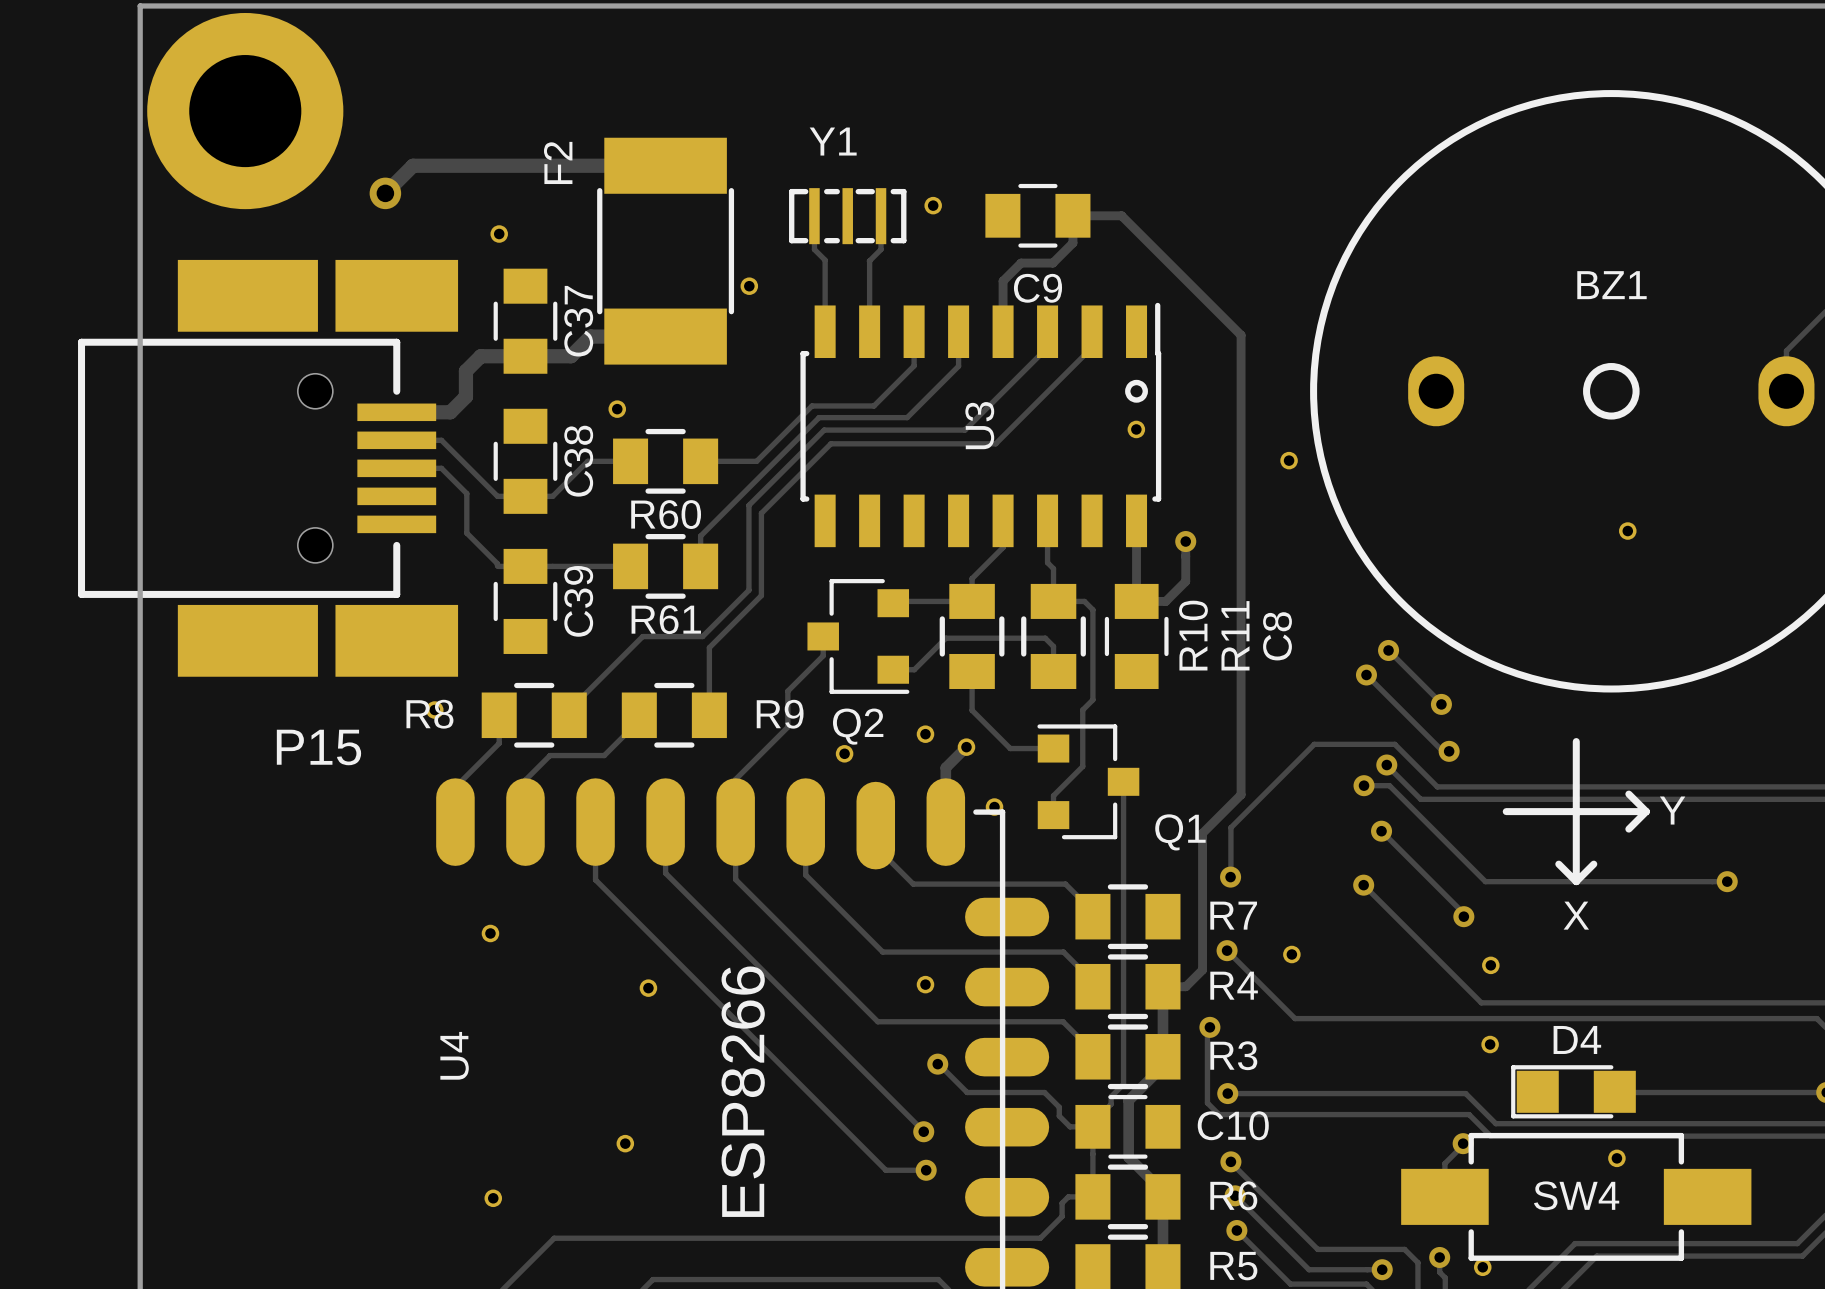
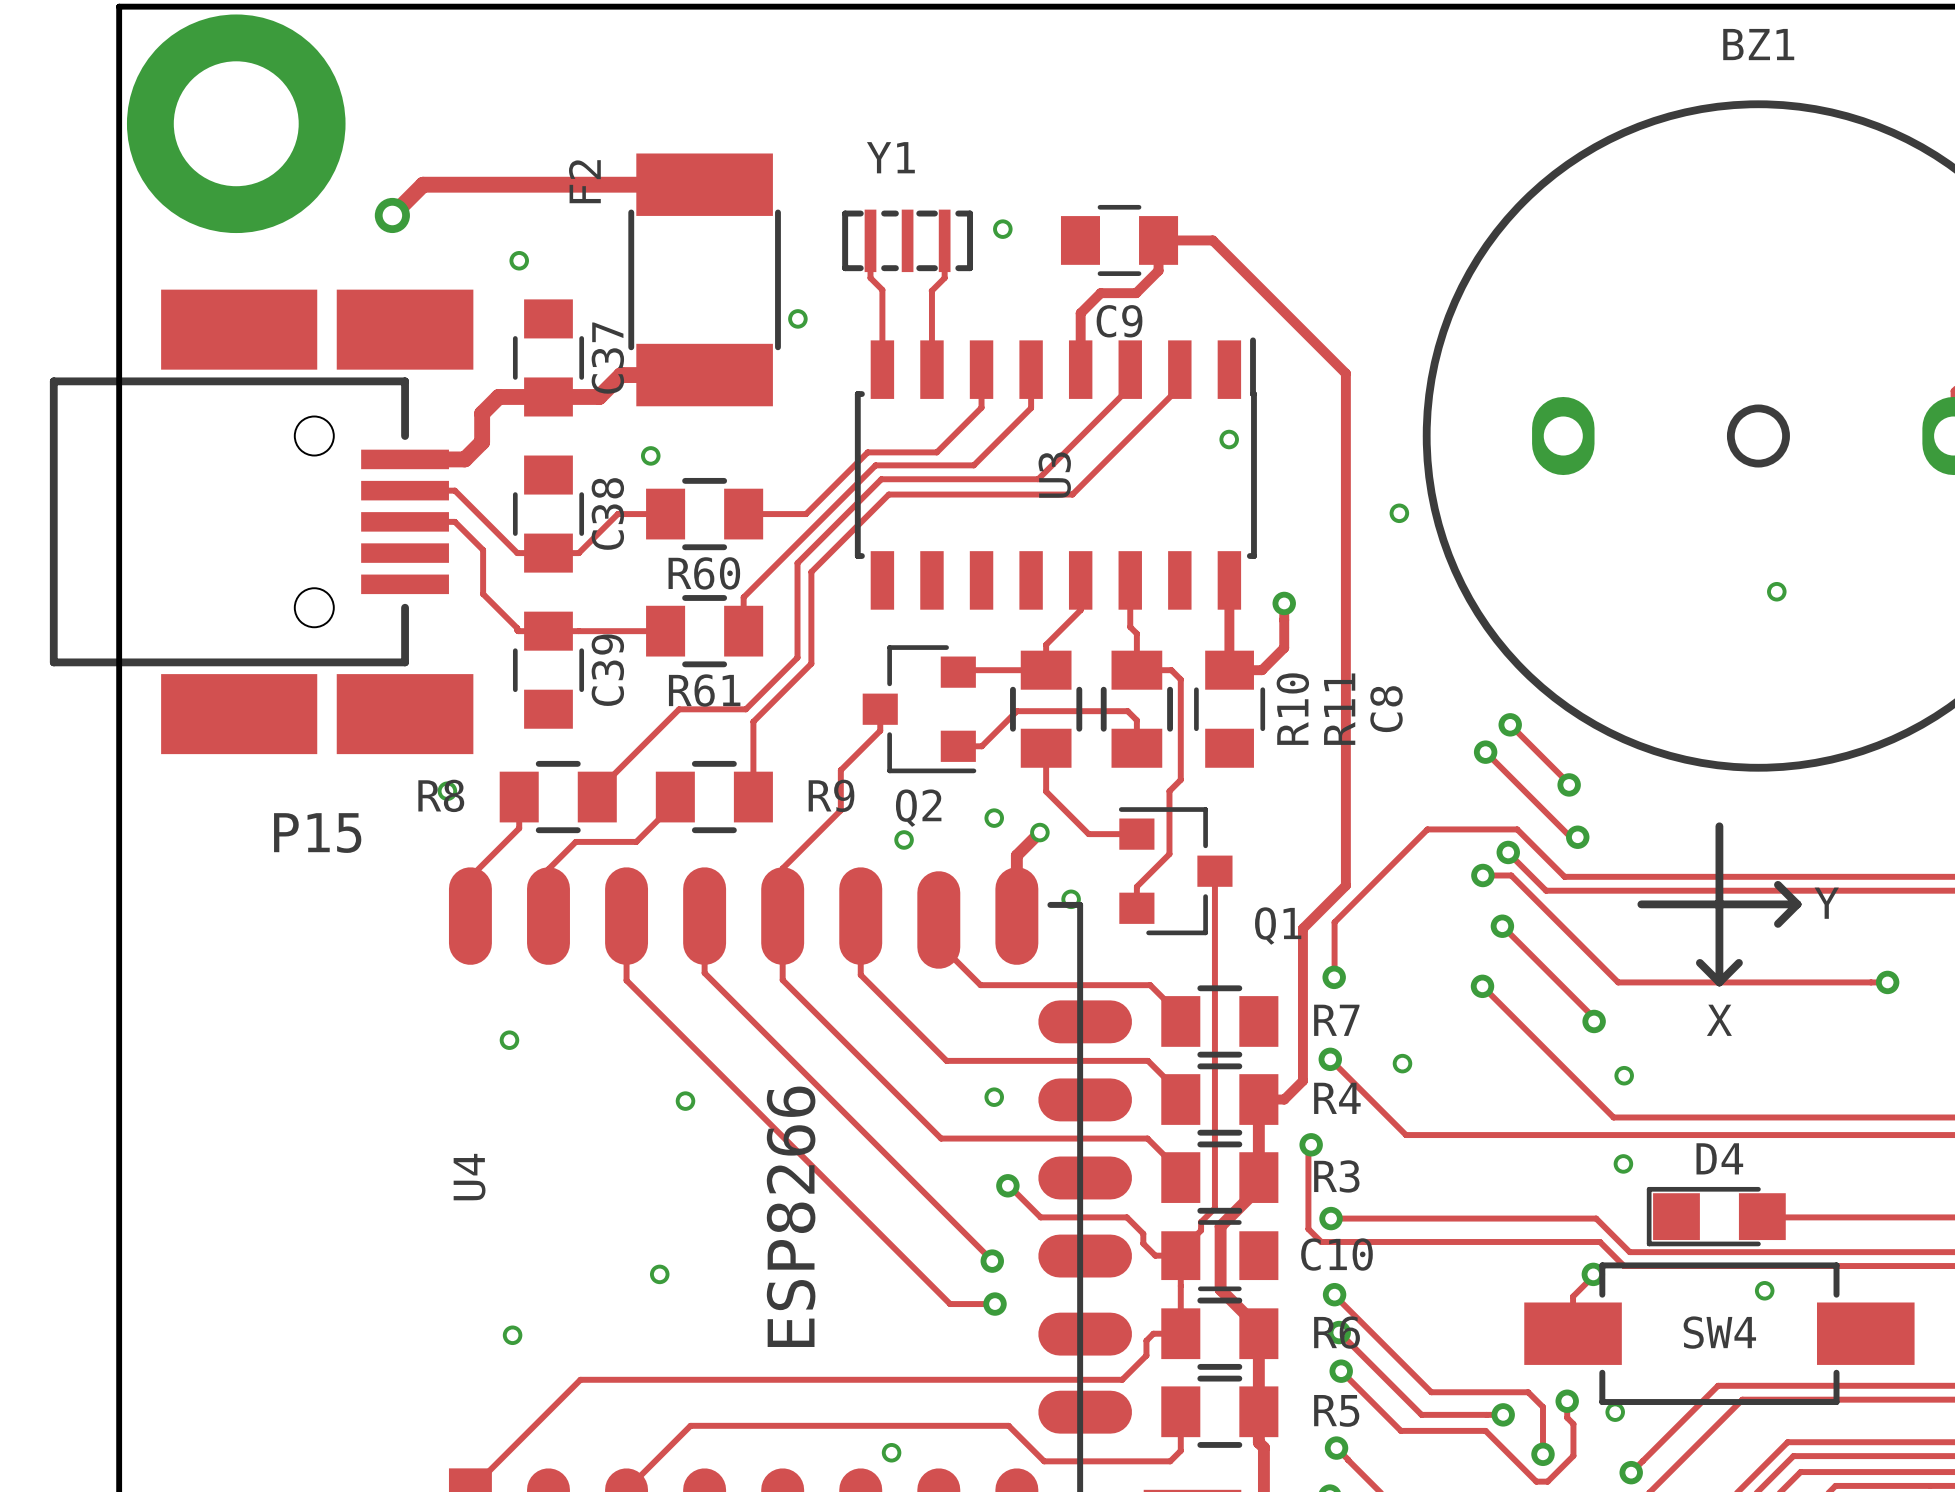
BZ1 name position: BZ1 (1611, 285) -> BZ1 (1758, 44)
U3 footprint: [800, 302, 1162, 548] -> [854, 337, 1257, 610]
part position: (1136, 429) -> (1229, 439)

